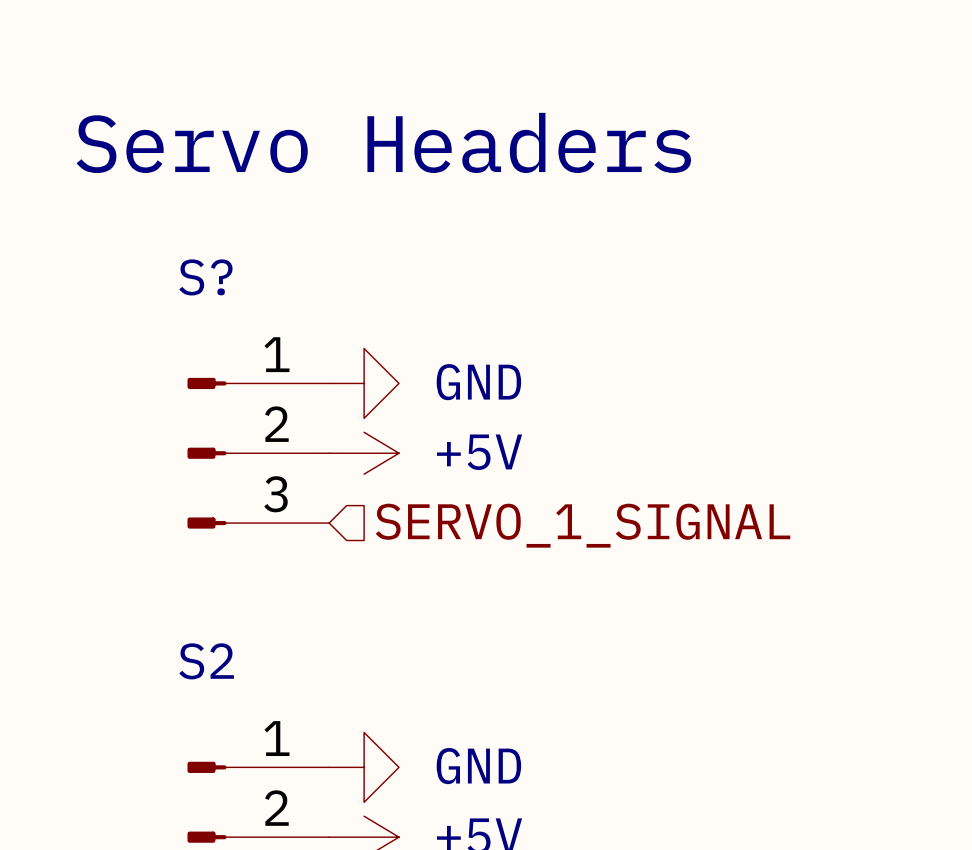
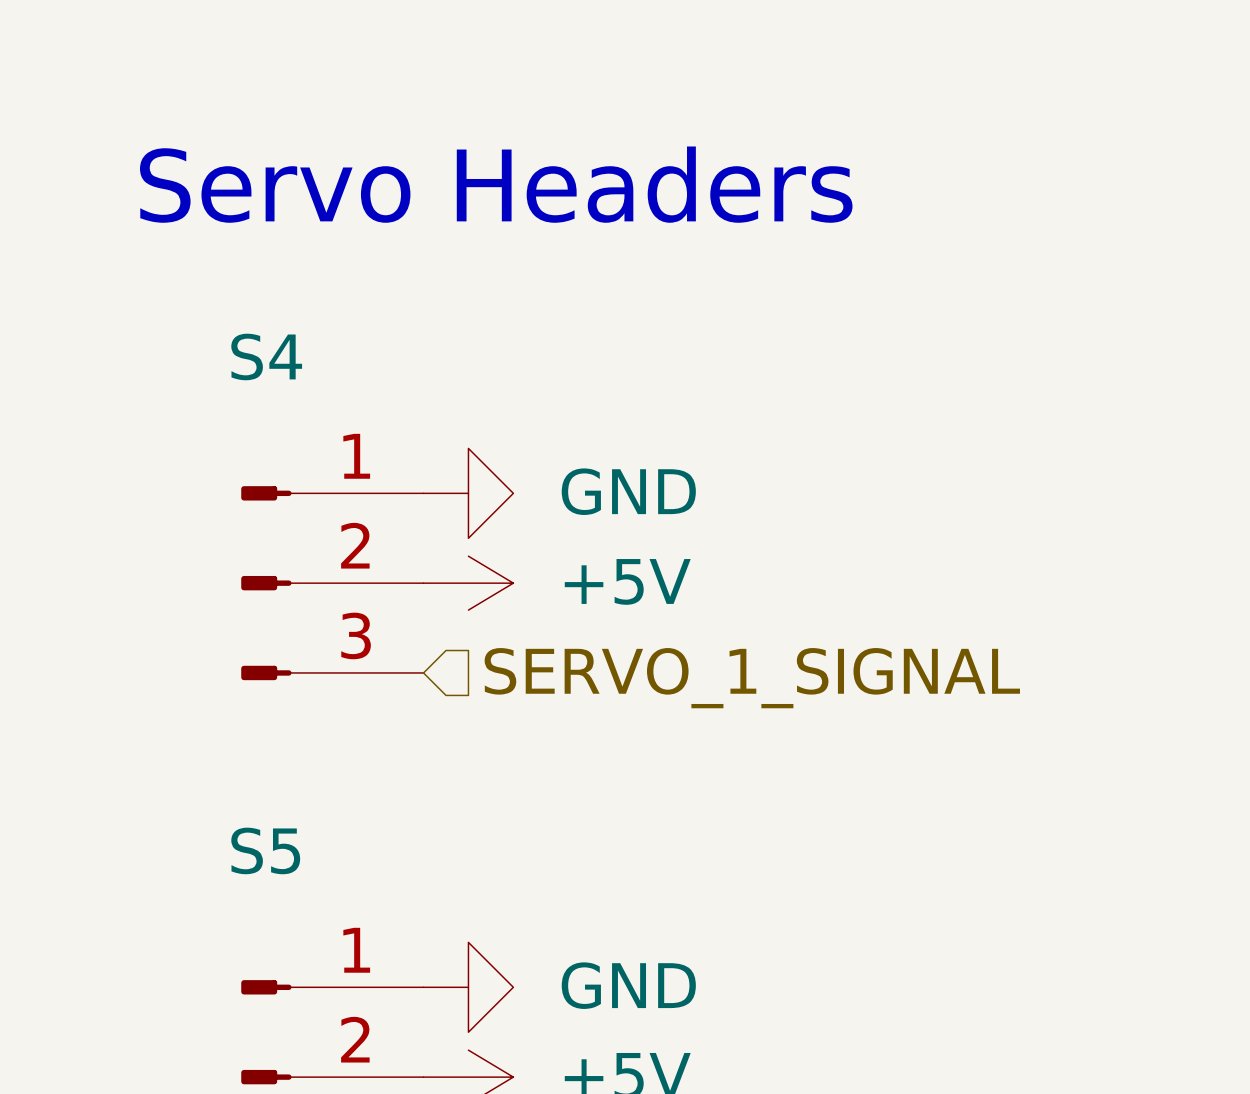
S? name: S? (205, 277) -> S4 (266, 356)
S2 name: S2 (206, 661) -> S5 (265, 850)

